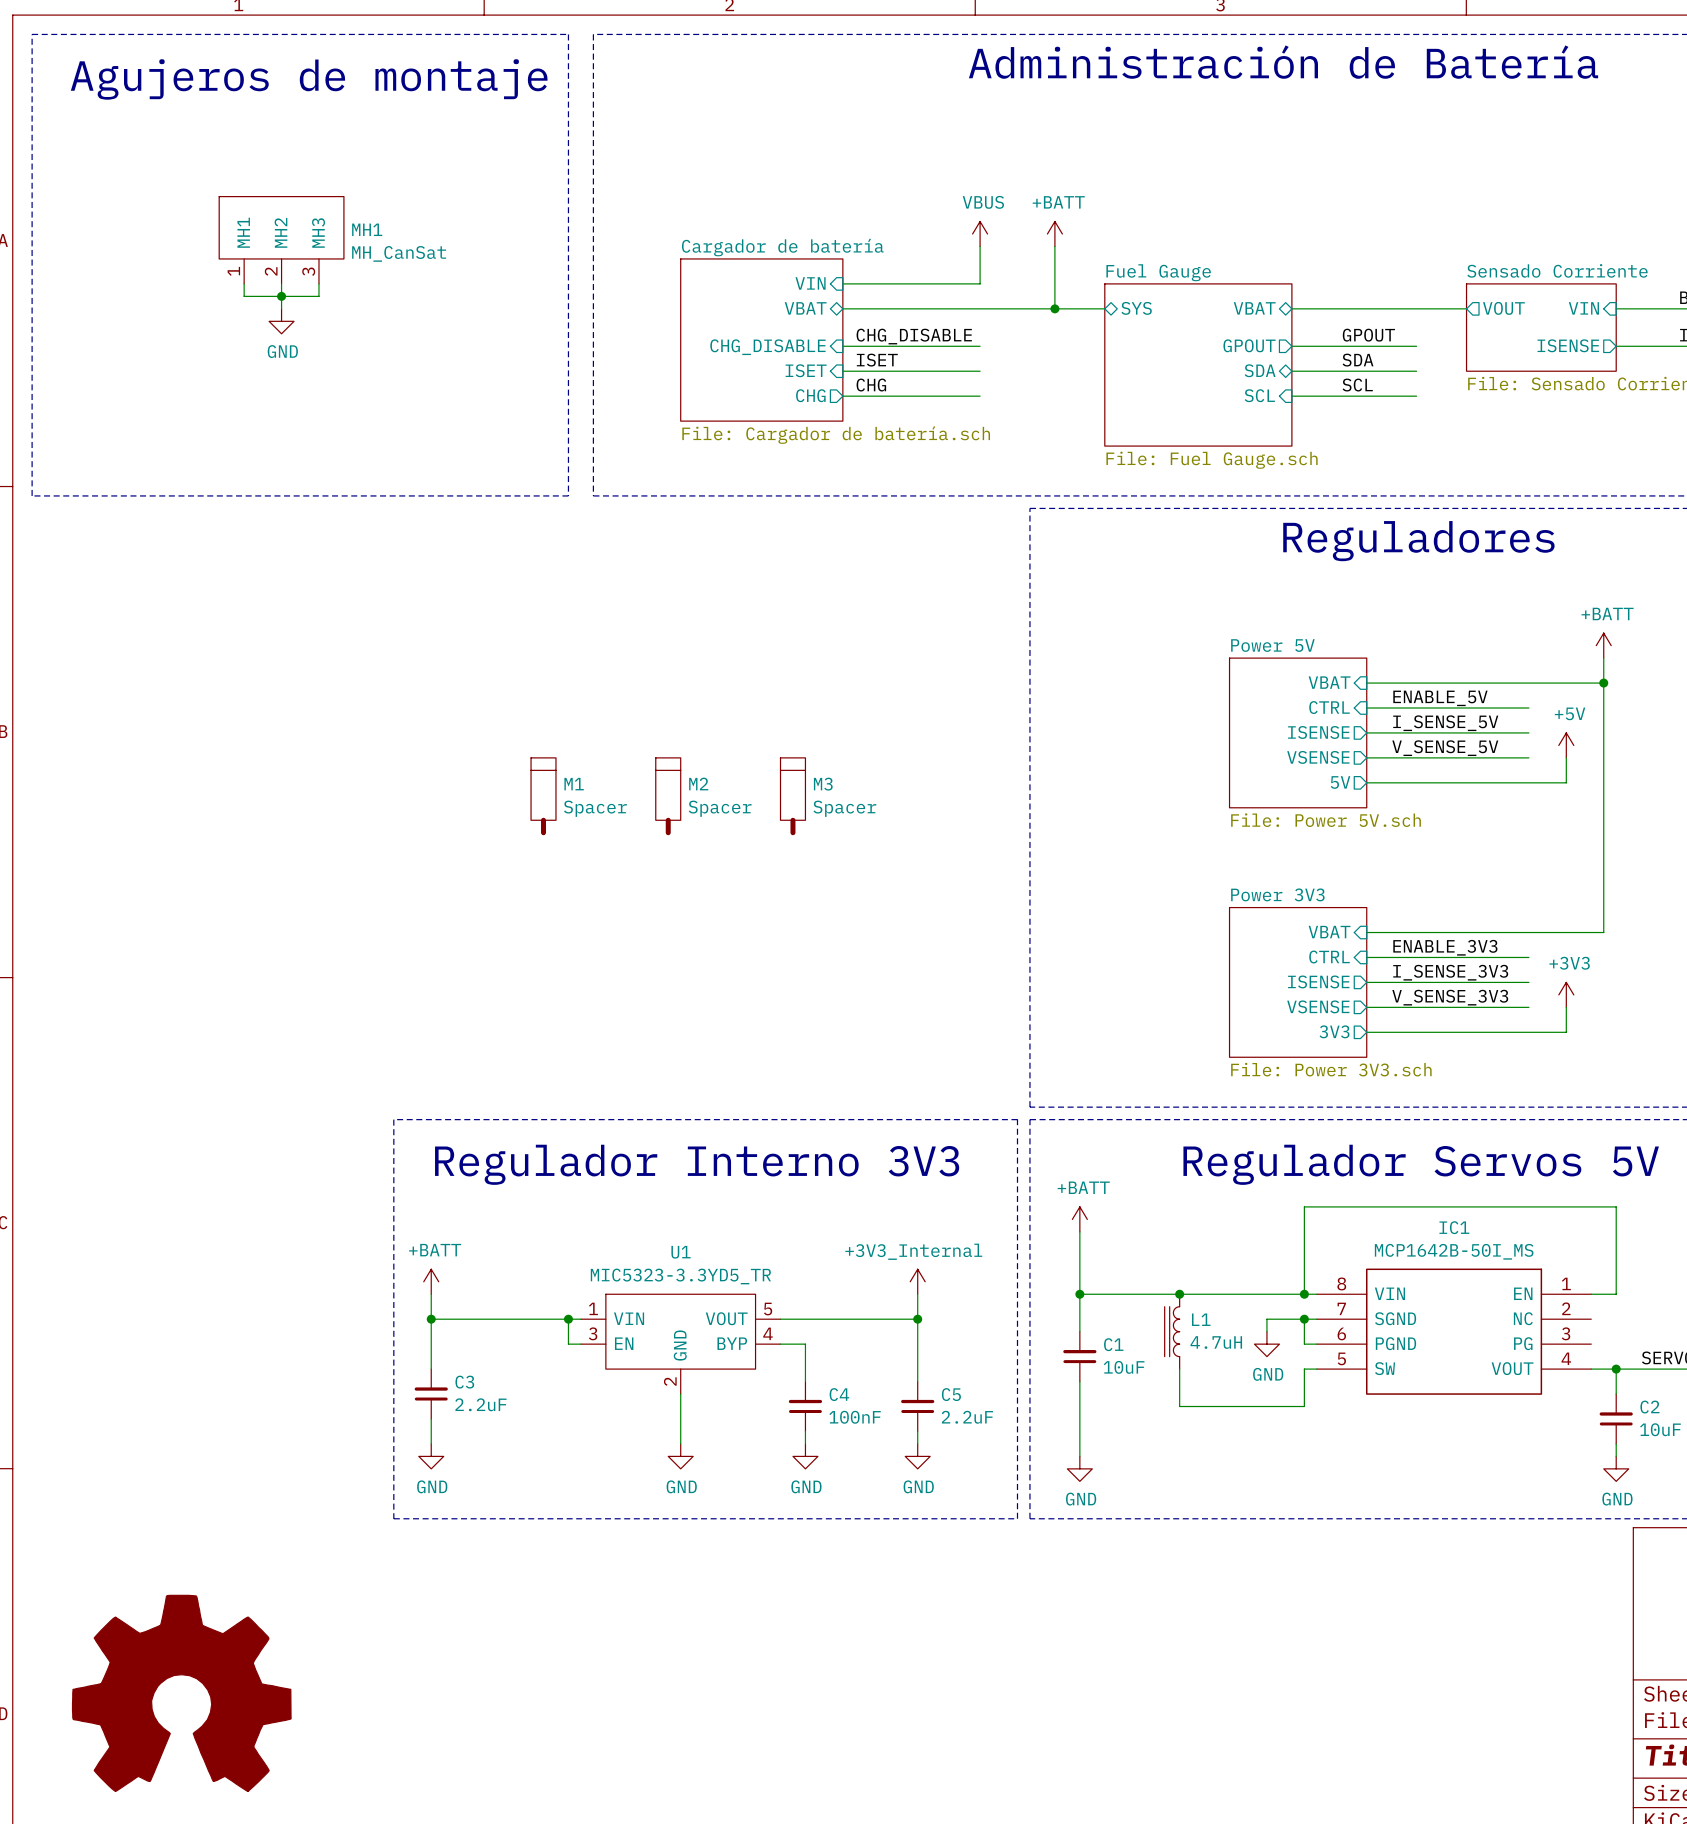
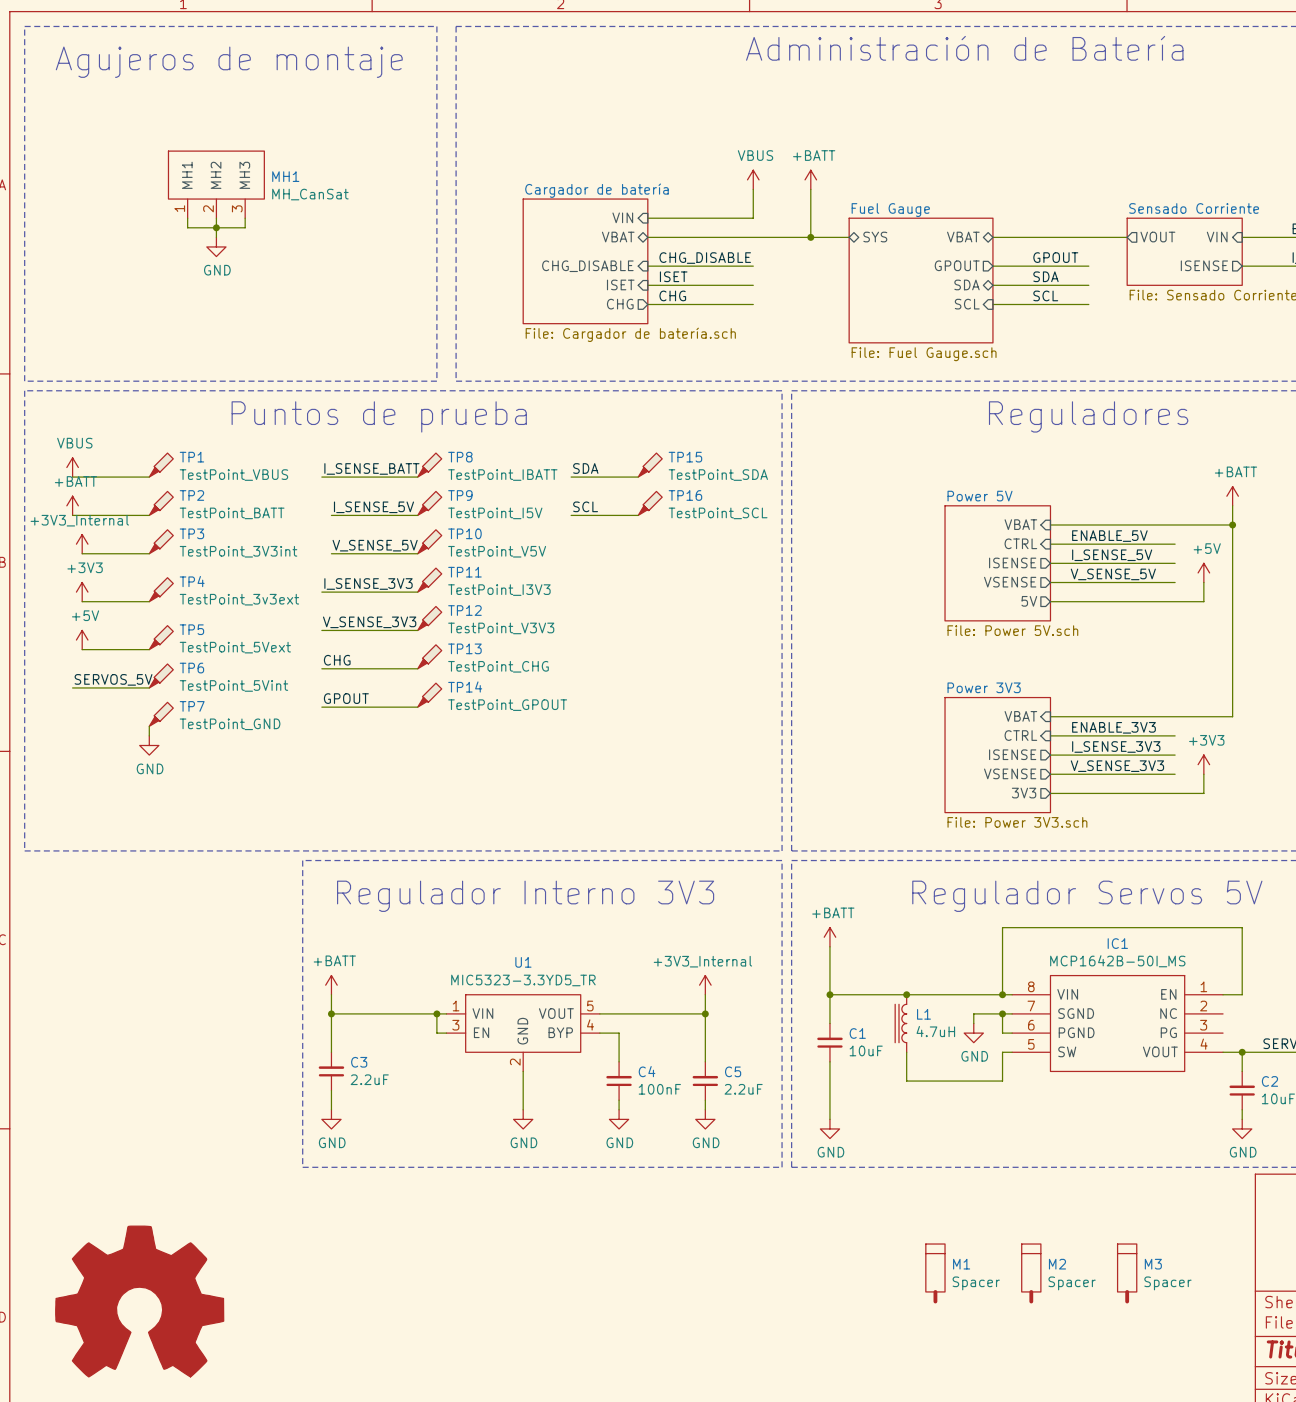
line: none -> (24, 390) (24, 850) (782, 850) (782, 390) (24, 390)
text: none -> Puntos de prueba (379, 416)
TP1: none -> TestPoint_VBUS (161, 465)
TP8: none -> TestPoint_IBATT (429, 465)
TP15: none -> TestPoint_SDA (650, 465)
power symbol: none -> VBUS (72, 467)
label: none -> SDA (585, 468)
label: none -> I_SENSE_BATT (371, 468)
wire: none -> (72, 477) (149, 477)
wire: none -> (321, 477) (417, 477)
wire: none -> (571, 477) (638, 477)
TP2: none -> TestPoint_BATT (161, 503)
TP9: none -> TestPoint_I5V (429, 503)
TP16: none -> TestPoint_SCL (650, 503)
power symbol: none -> +BATT (72, 505)
label: none -> SCL (585, 506)
label: none -> I_SENSE_5V (373, 507)
wire: none -> (72, 515) (149, 515)
wire: none -> (331, 515) (417, 515)
wire: none -> (571, 515) (638, 515)
TP3: none -> TestPoint_3V3int (161, 541)
TP10: none -> TestPoint_V5V (429, 541)
power symbol: none -> +3V3_Internal (82, 544)
label: none -> V_SENSE_5V (375, 545)
wire: none -> (82, 553) (149, 553)
wire: none -> (331, 553) (417, 553)
TP11: none -> TestPoint_I3V3 (429, 580)
label: none -> I_SENSE_3V3 (368, 584)
TP4: none -> TestPoint_3v3ext (161, 589)
power symbol: none -> +3V3 (82, 592)
wire: none -> (321, 592) (417, 592)
wire: none -> (82, 601) (149, 601)
M1 position: (543, 796) -> (935, 1273)
M2 position: (668, 796) -> (1031, 1273)
M3 position: (792, 796) -> (1127, 1273)
TP12: none -> TestPoint_V3V3 (429, 618)
label: none -> V_SENSE_3V3 (369, 622)
wire: none -> (321, 630) (417, 630)
TP5: none -> TestPoint_5Vext (161, 637)
power symbol: none -> +5V (82, 640)
wire: none -> (82, 649) (149, 649)
TP13: none -> TestPoint_CHG (429, 656)
label: none -> CHG (337, 660)
wire: none -> (321, 668) (417, 668)
TP6: none -> TestPoint_5Vint (161, 675)
label: none -> SERVOS_5V (113, 679)
wire: none -> (72, 687) (149, 687)
TP14: none -> TestPoint_GPOUT (429, 695)
label: none -> GPOUT (346, 698)
wire: none -> (321, 707) (417, 707)
TP7: none -> TestPoint_GND (161, 714)
wire: none -> (149, 726) (149, 735)
power symbol: none -> GND (149, 745)

